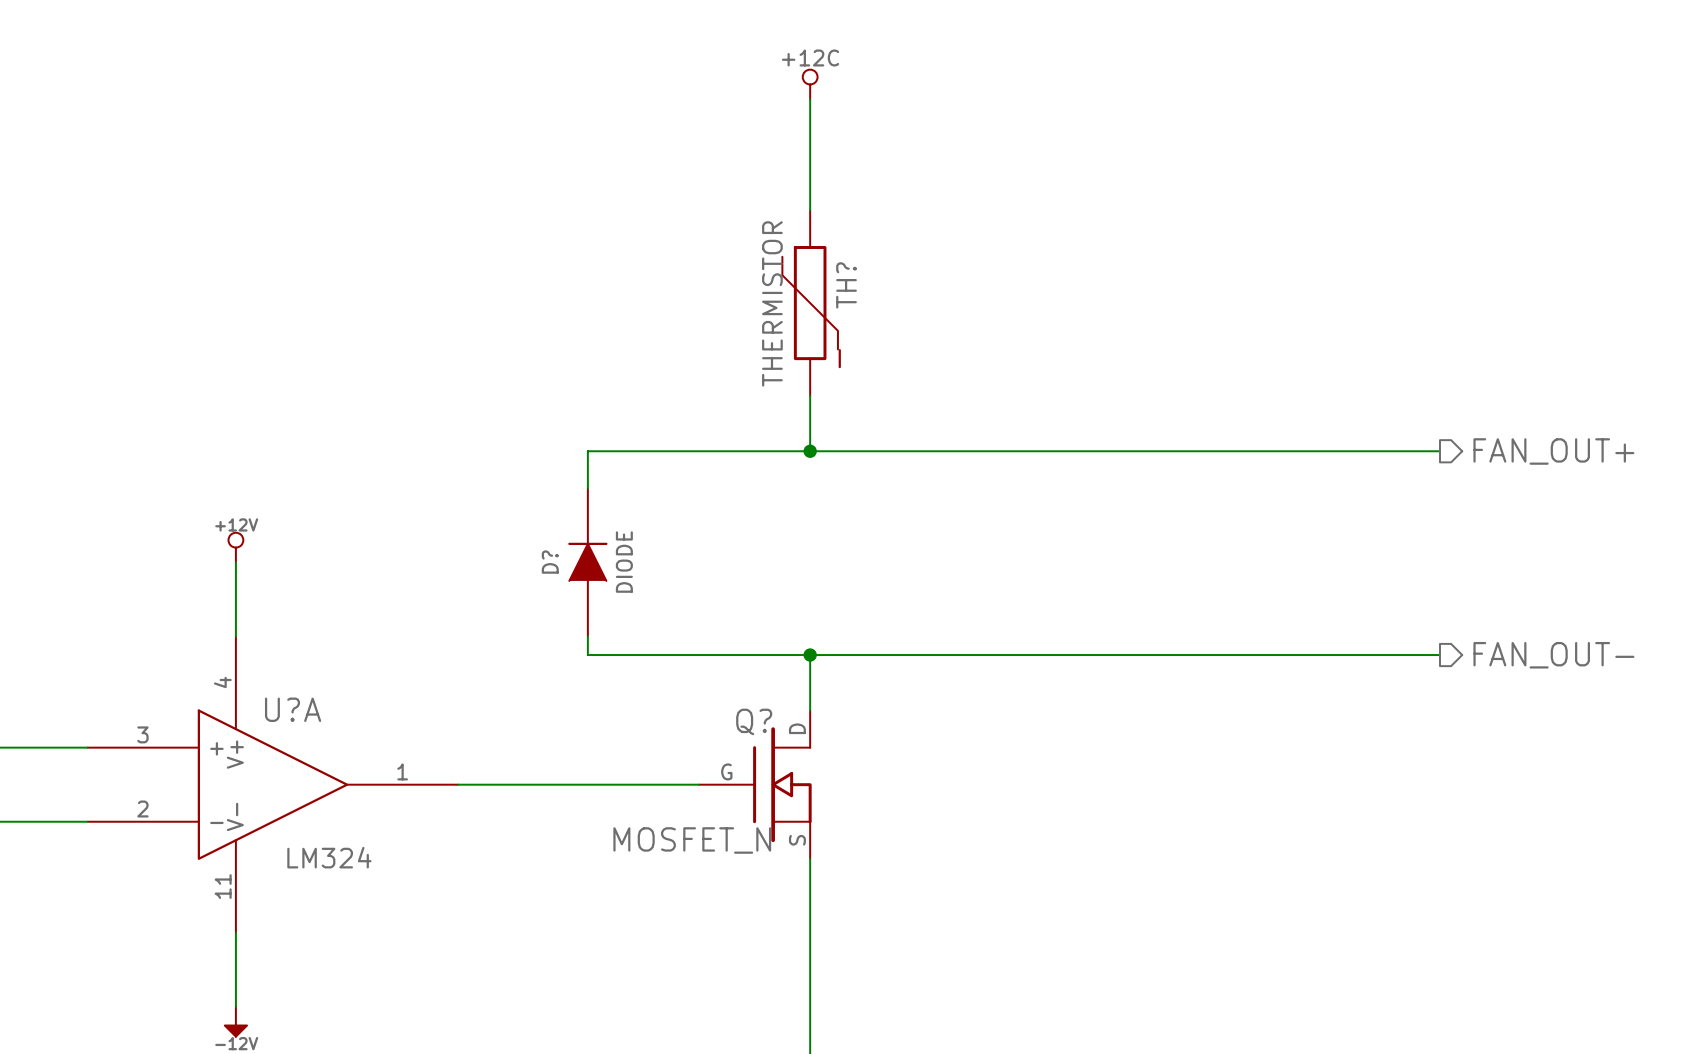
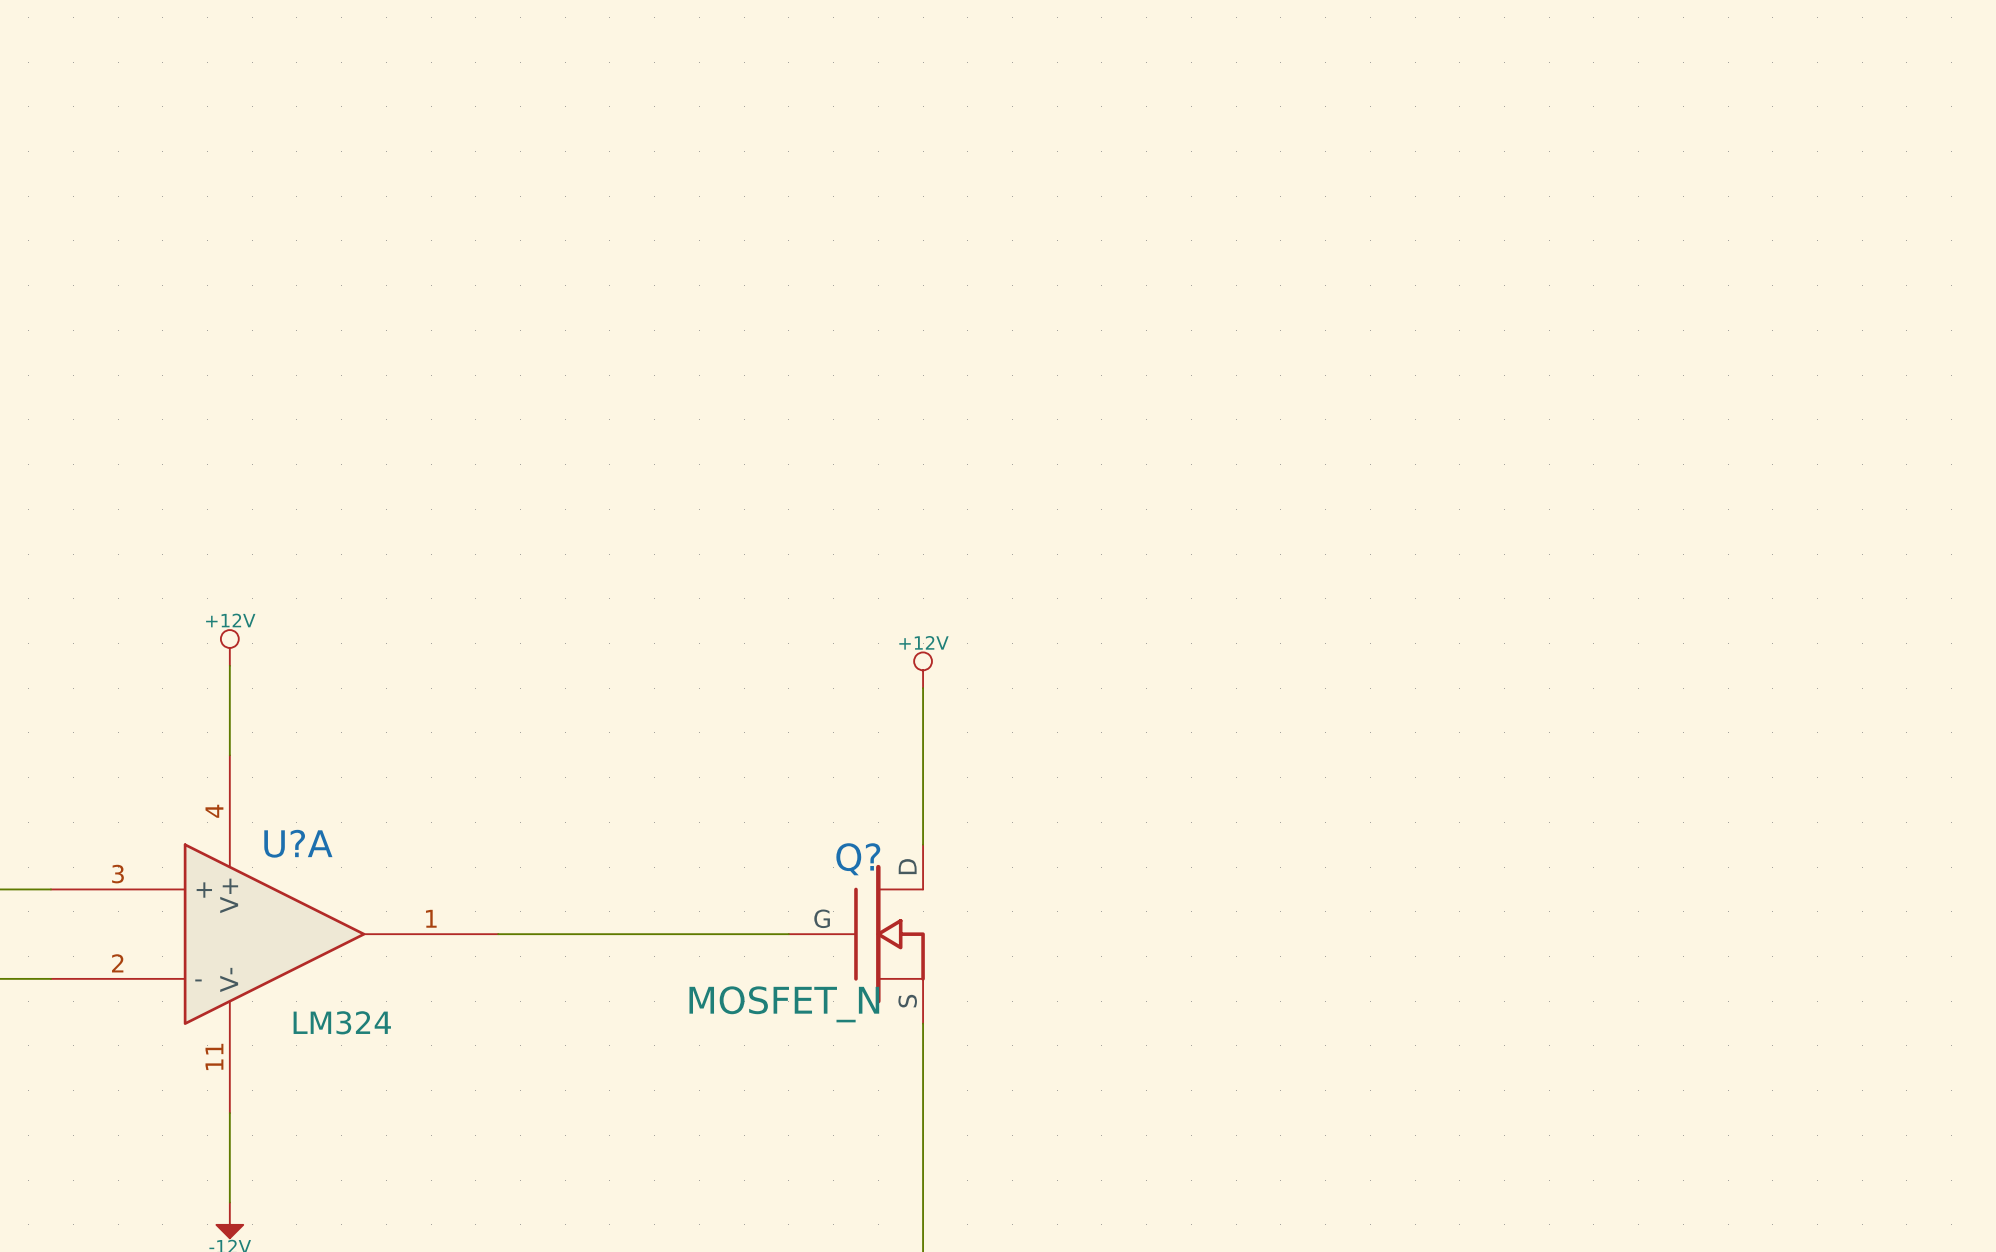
power symbol: +12C (810, 84) -> none
wire: (810, 99) (810, 210) -> none
TH?: THERMISTOR (810, 303) -> none
wire: (810, 395) (810, 451) -> none
junction: (810, 451) -> none
wire: (1439, 451) (587, 451) (587, 488) -> none
hierarchical label: FAN_OUT+ (1553, 451) -> none
D?: DIODE (587, 562) -> none
power symbol: none -> +12V (923, 670)
wire: none -> (923, 688) (923, 777)
wire: (587, 636) (587, 655) (1439, 655) -> none
junction: (810, 655) -> none
hierarchical label: FAN_OUT- (1553, 655) -> none

